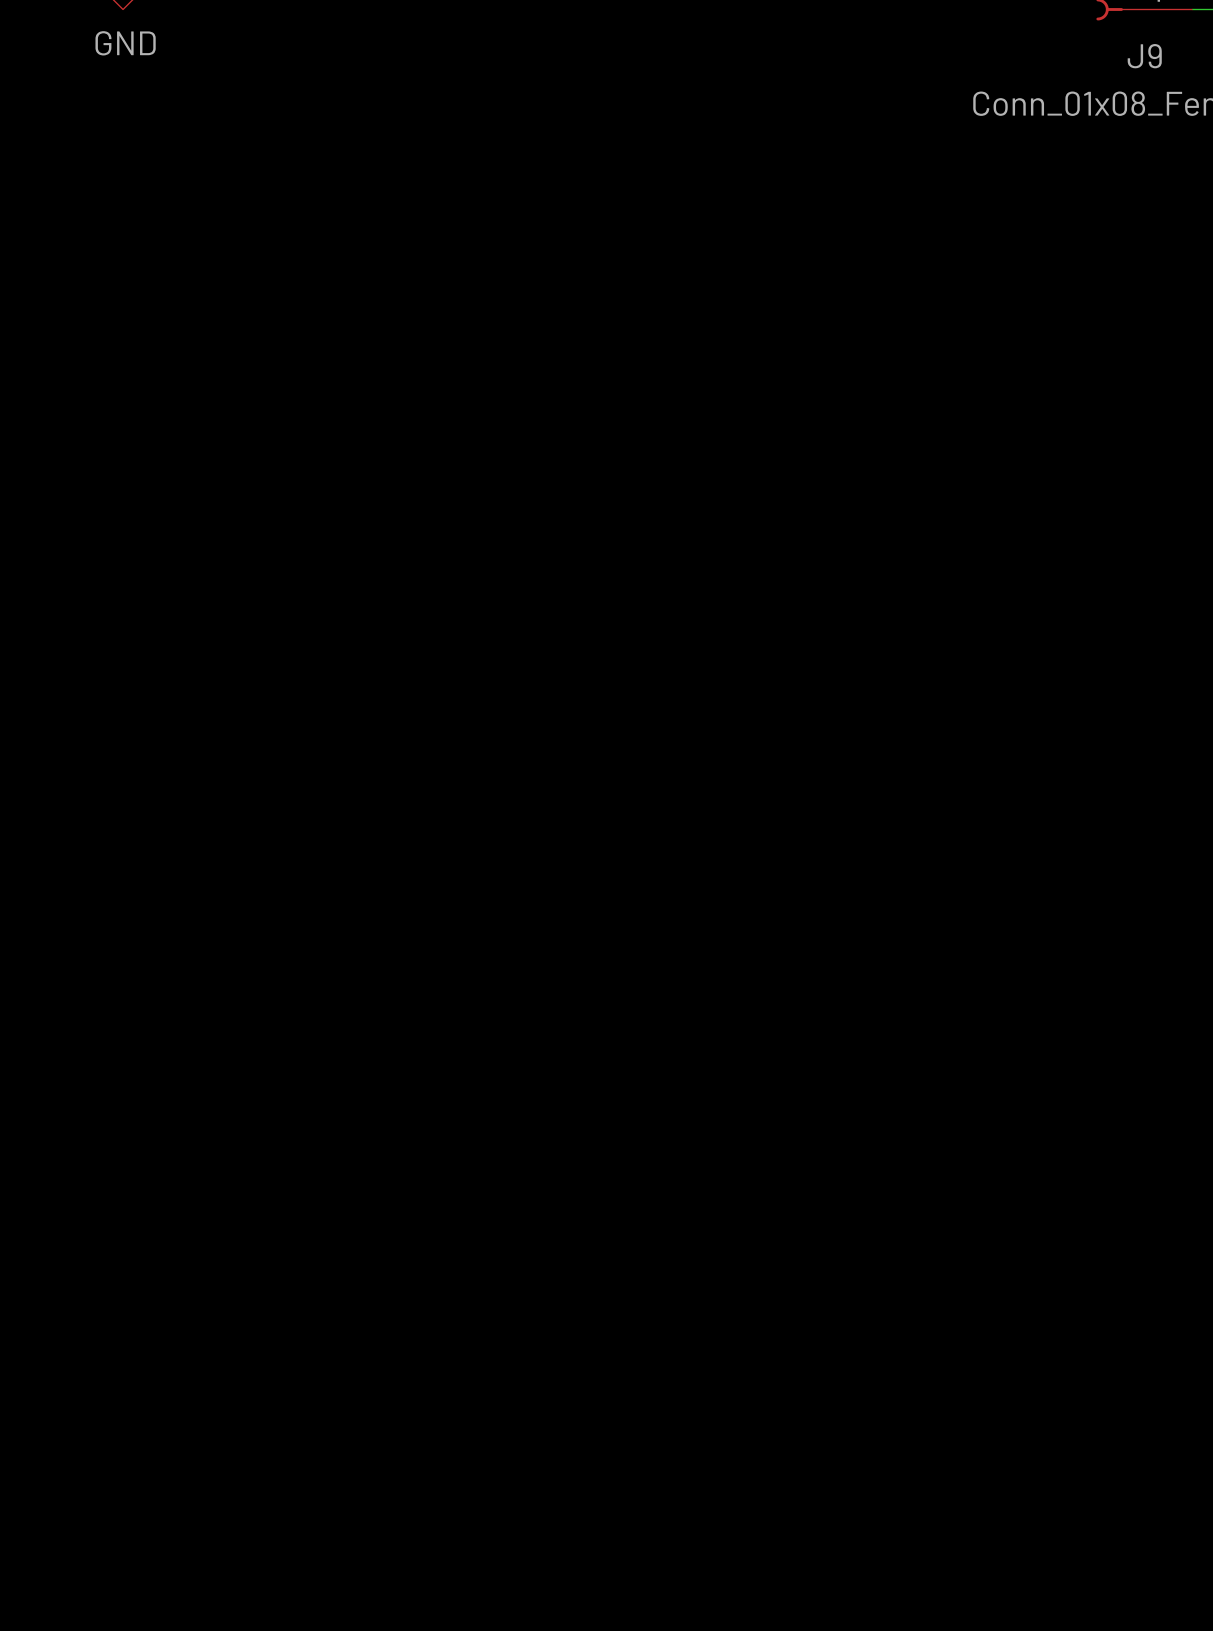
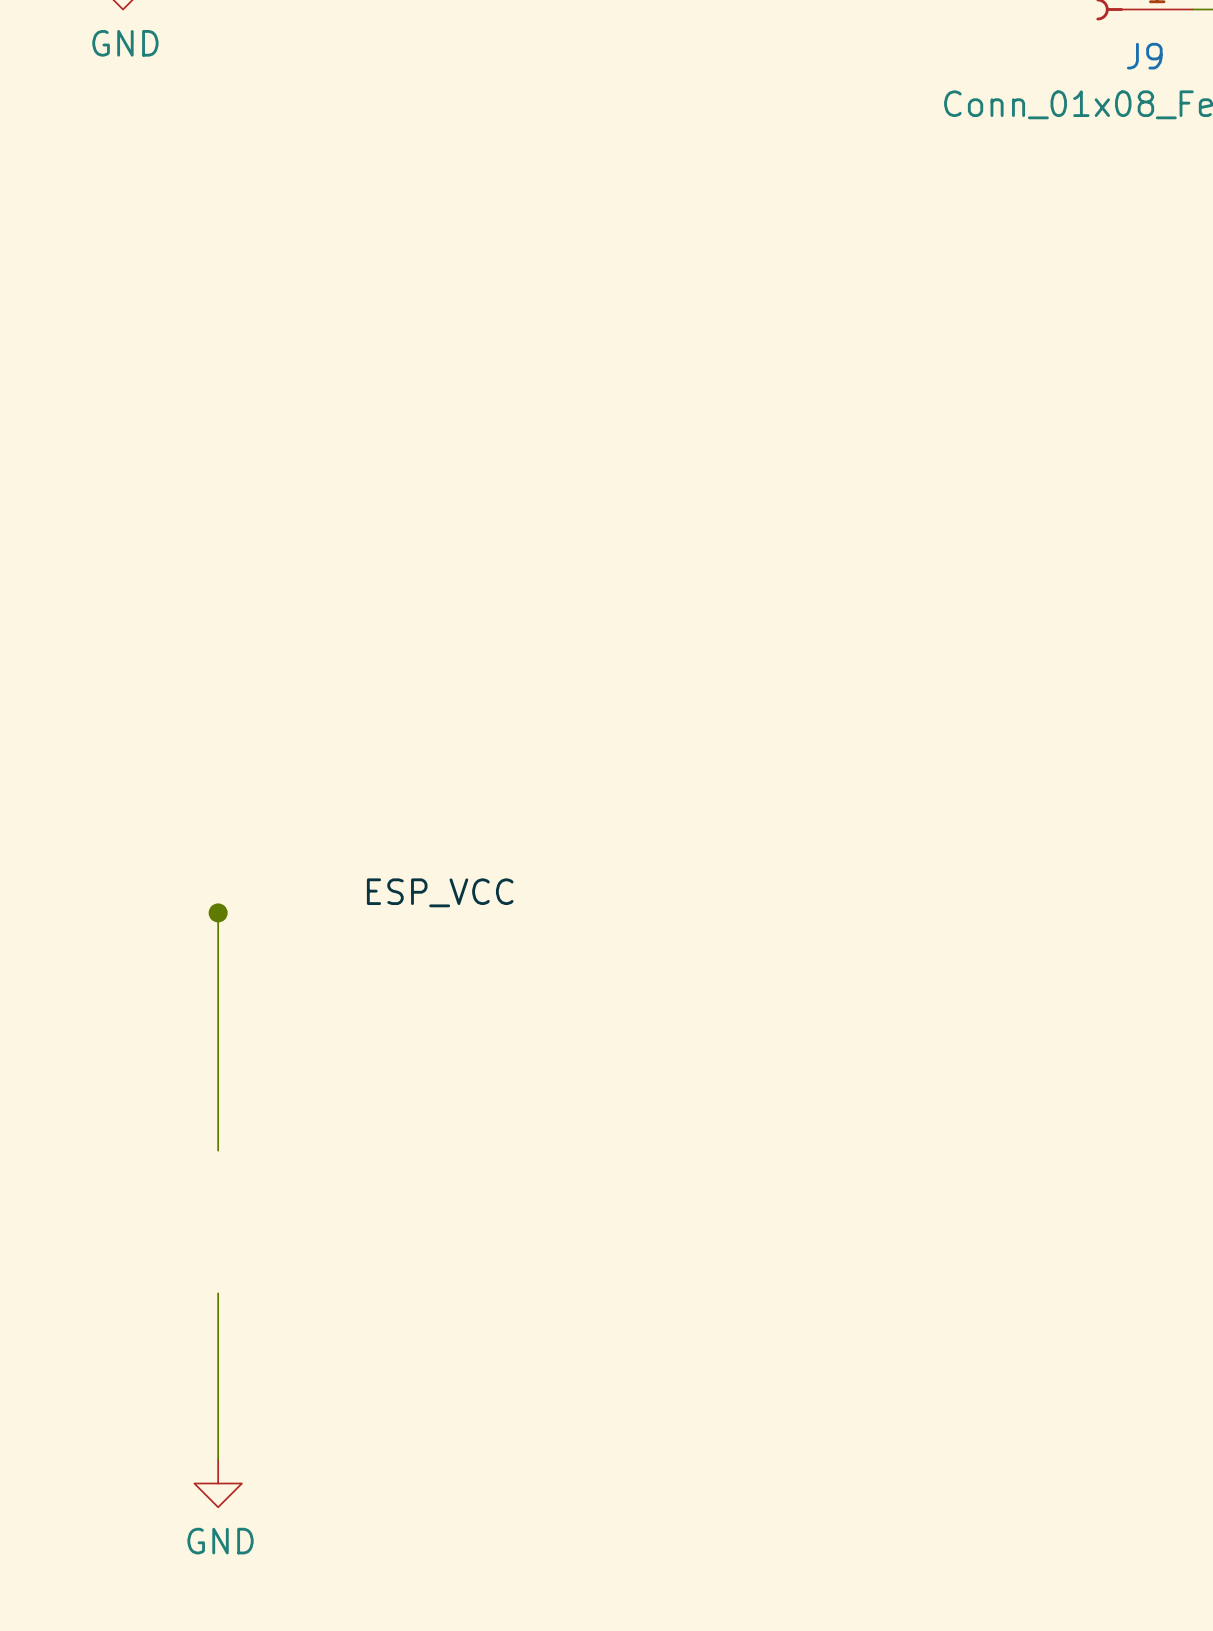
label: none -> ESP_VCC (440, 892)
wire: none -> (218, 912) (218, 1150)
junction: none -> (218, 912)
wire: none -> (218, 1293) (218, 1459)
power symbol: none -> GND (218, 1483)

